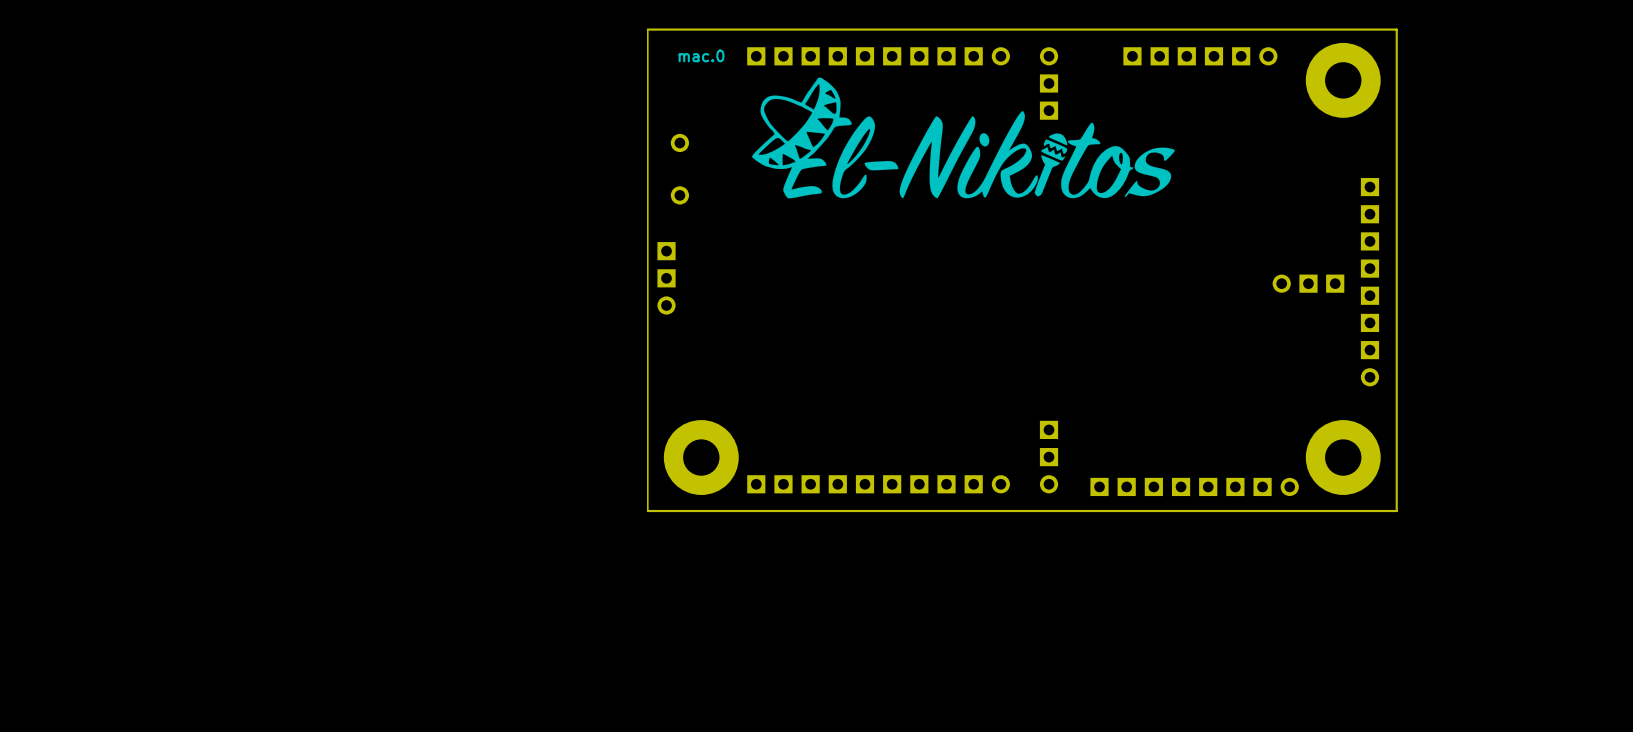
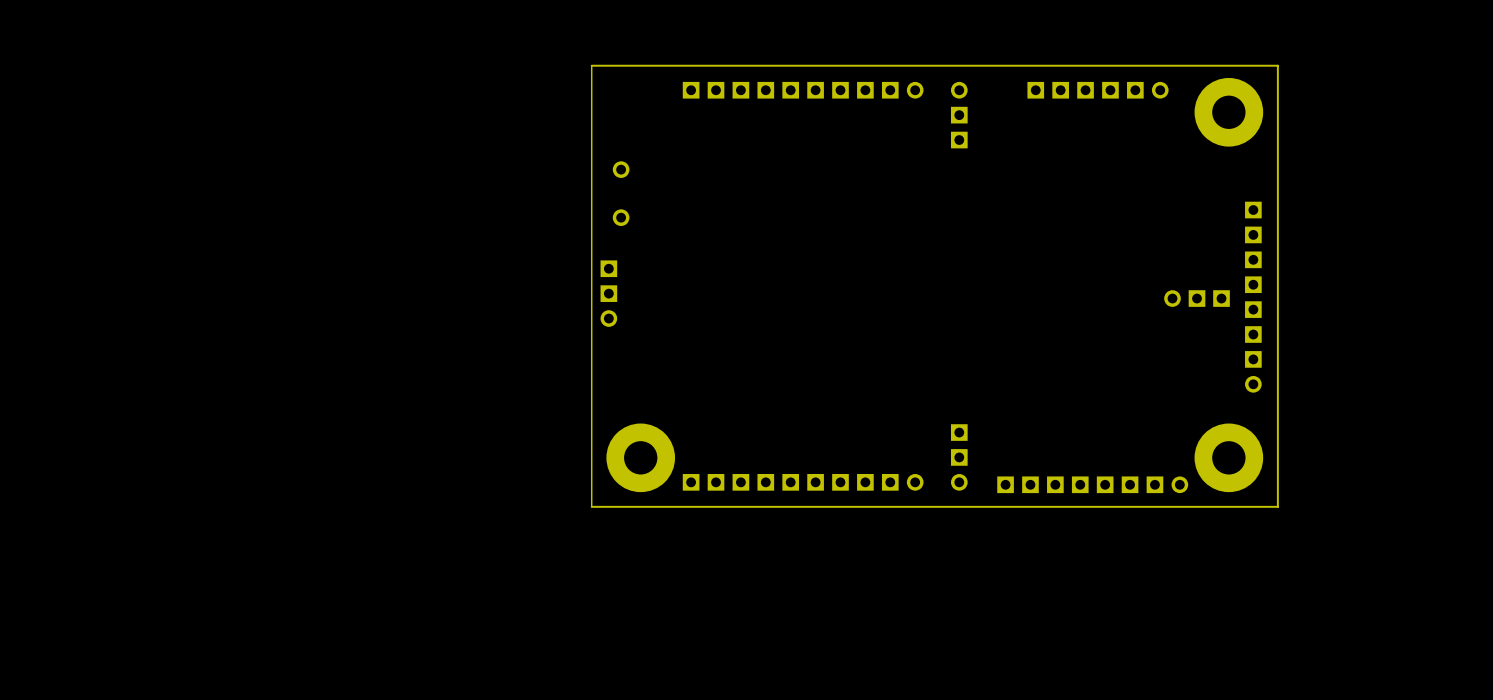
text: mac.0 (701, 55) -> none
drawing: [752, 77, 1175, 199] -> none

